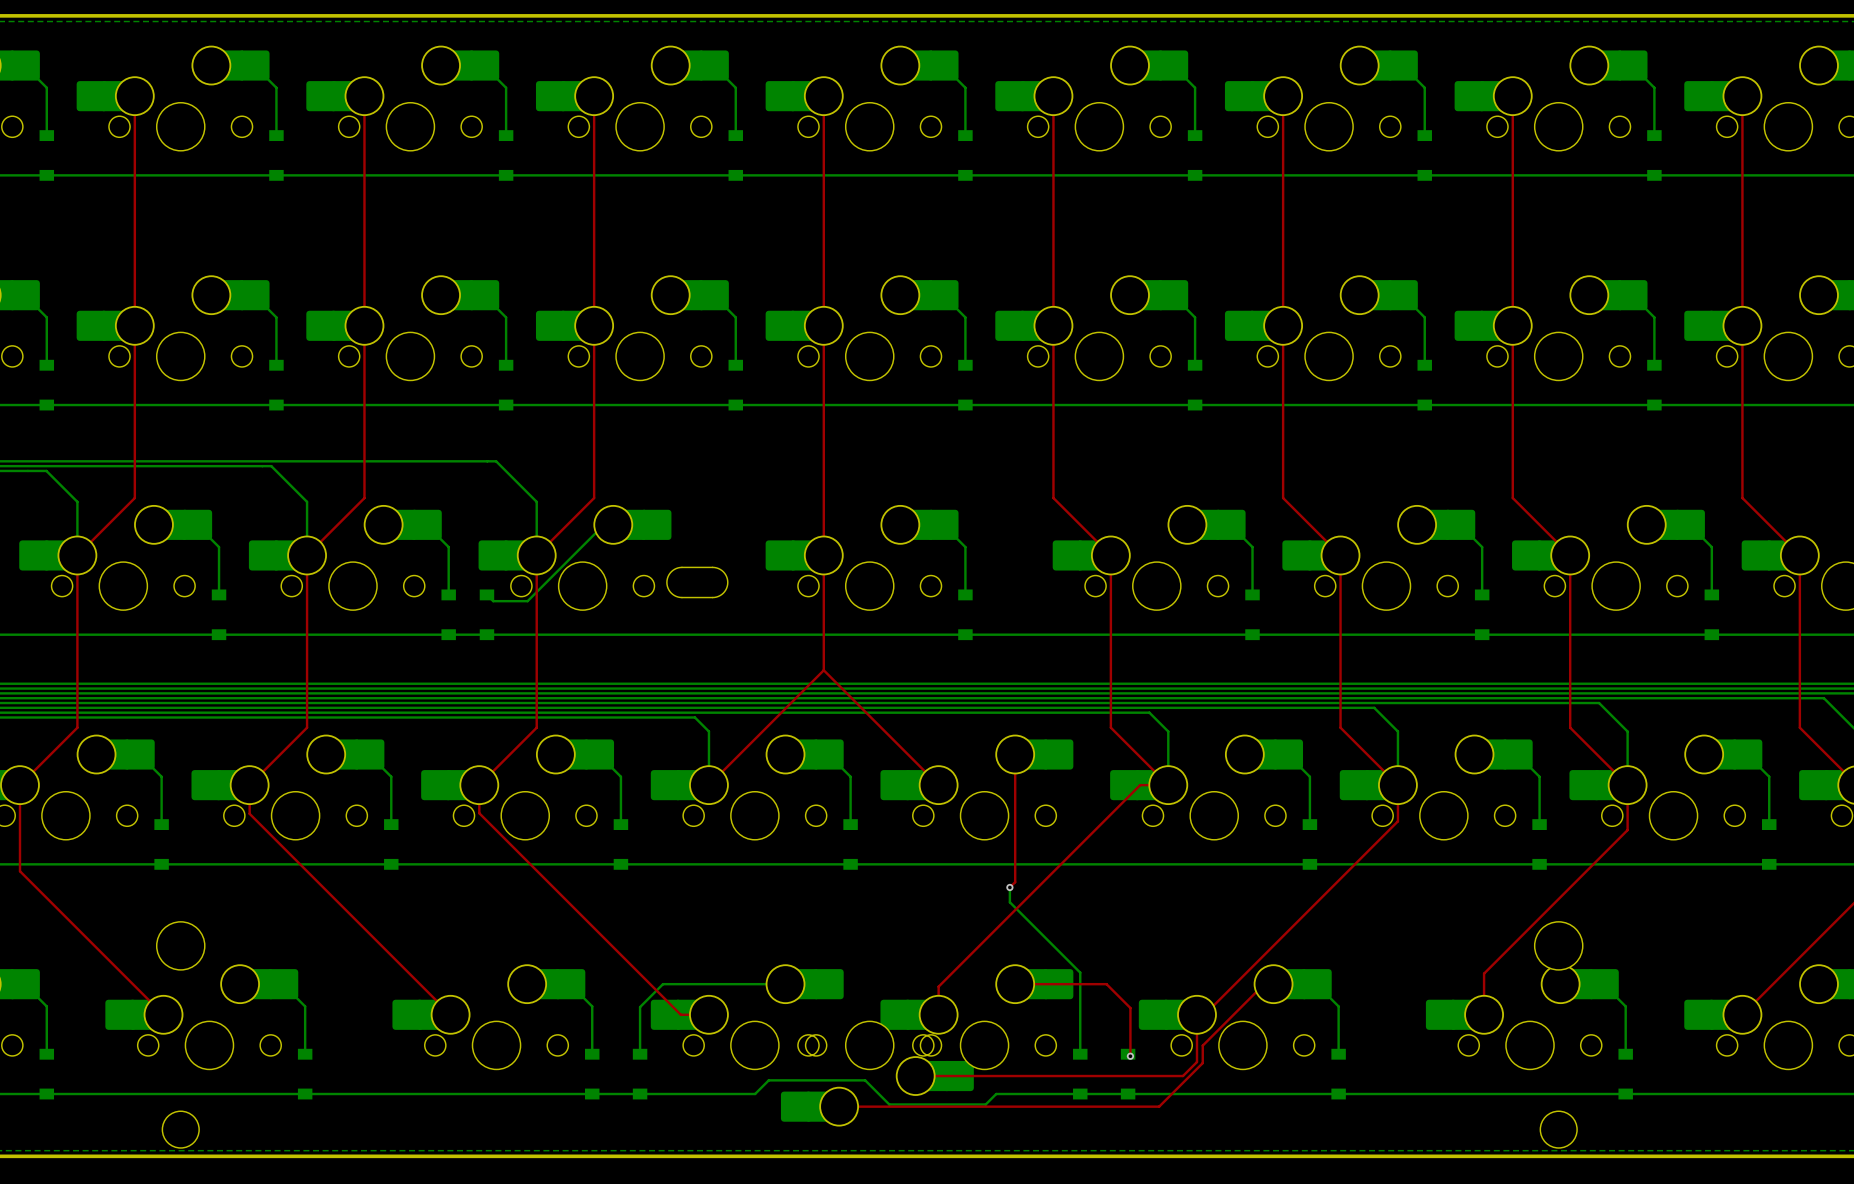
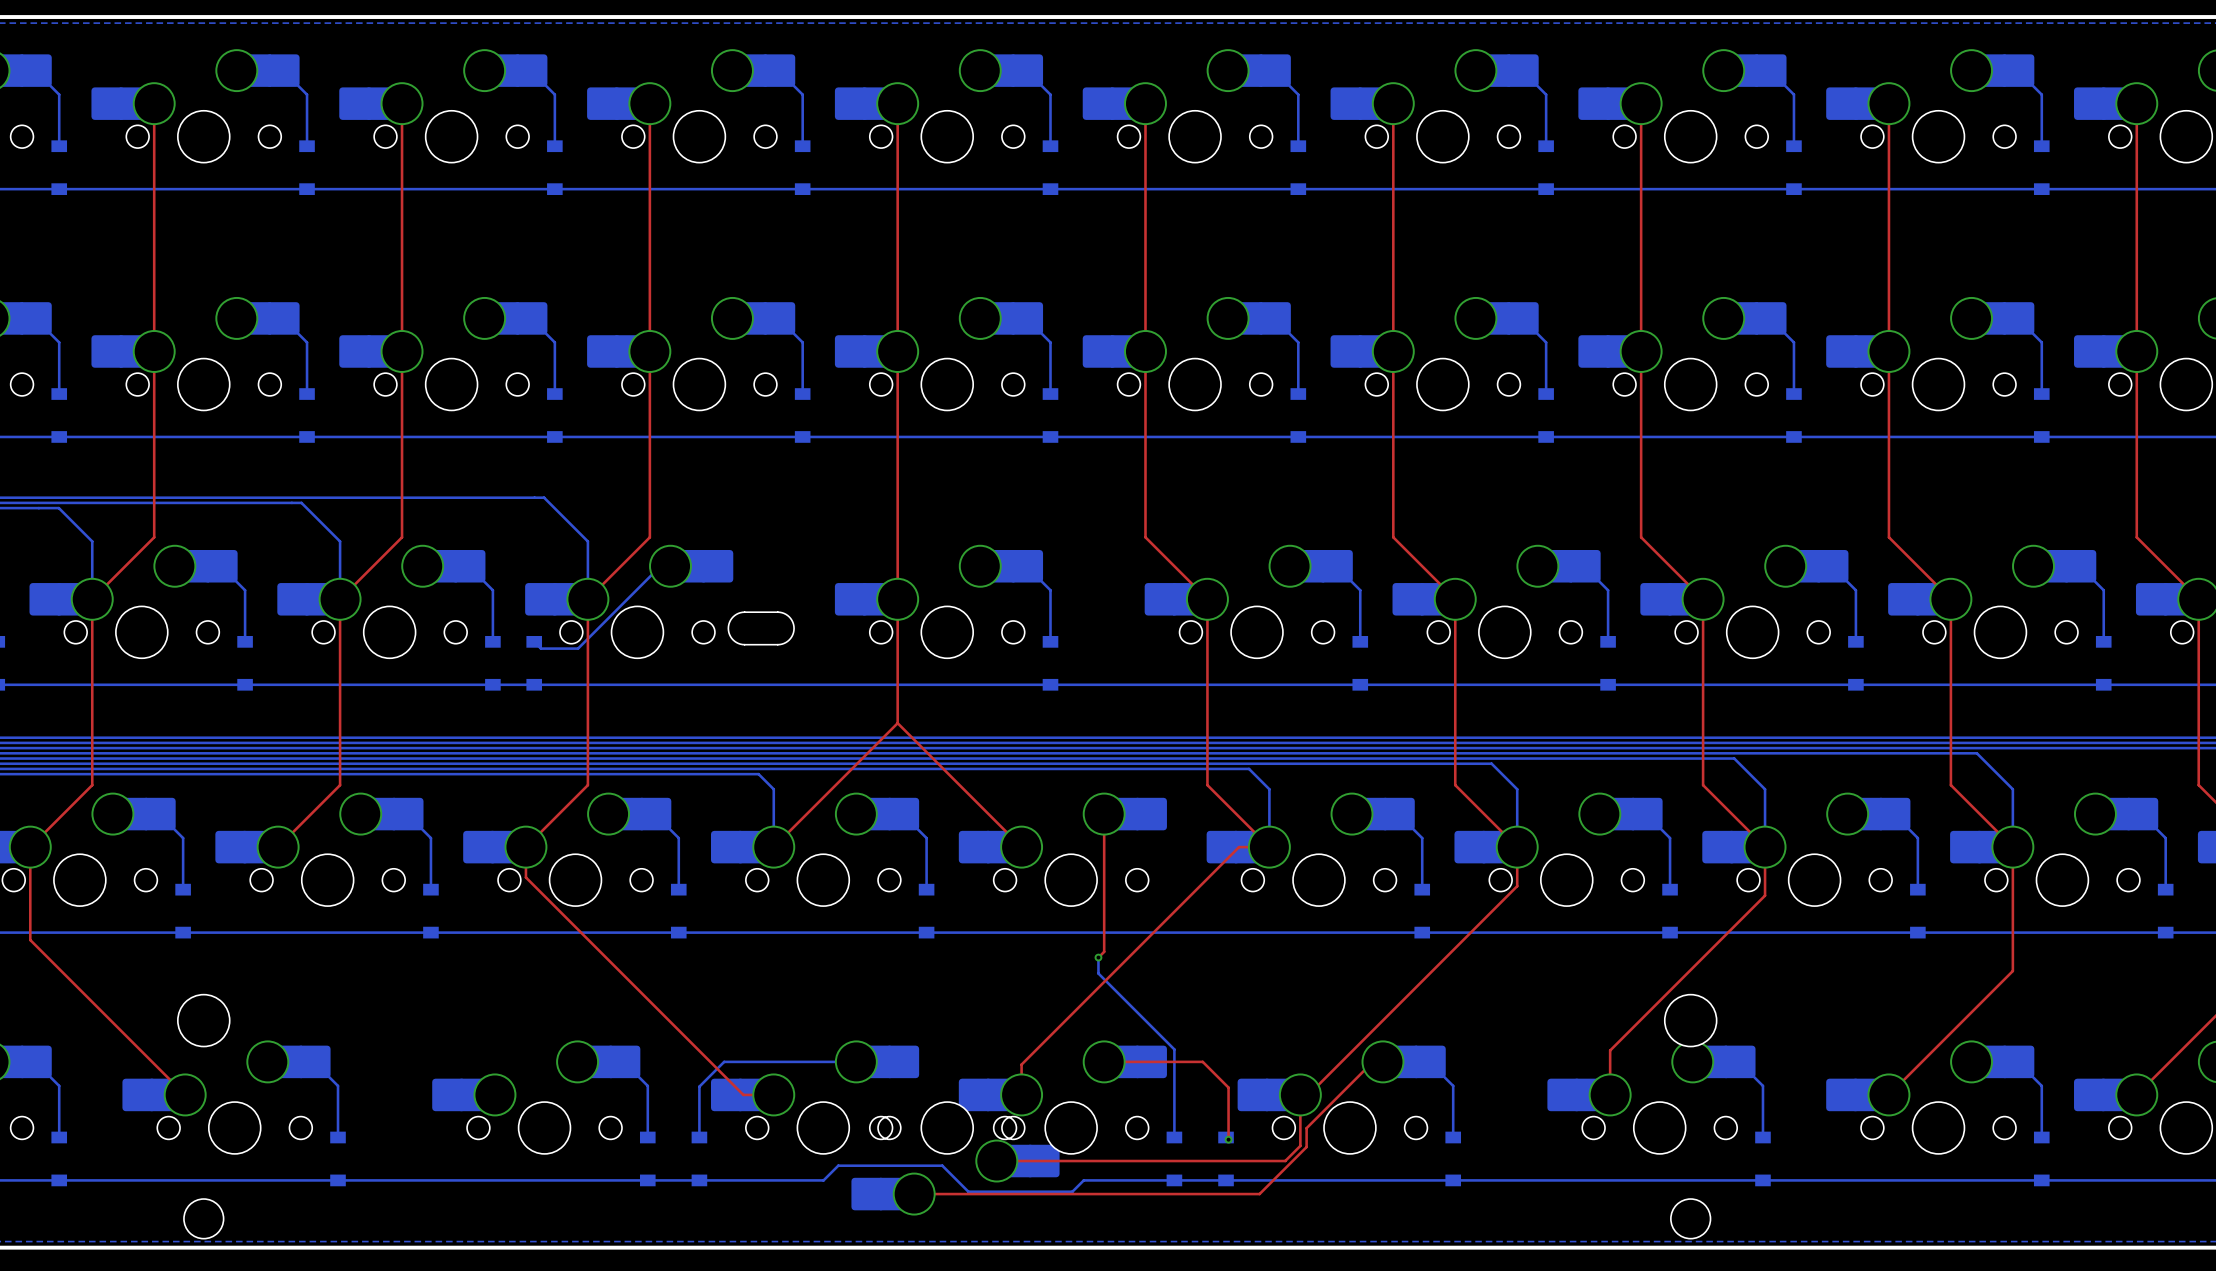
top track: (249, 785) (249, 813) (450, 1014) -> none

